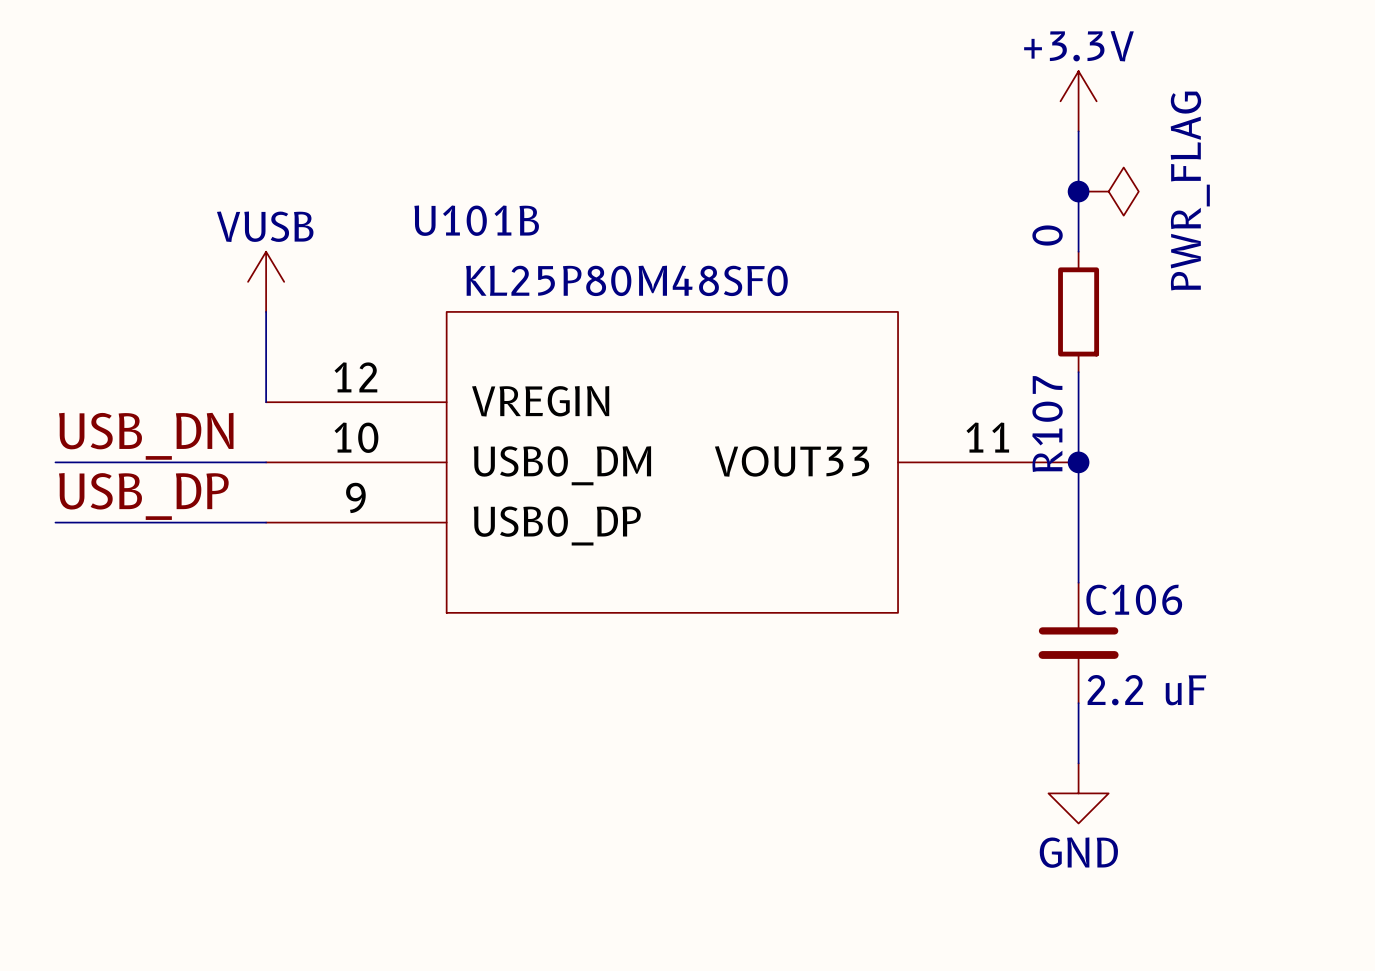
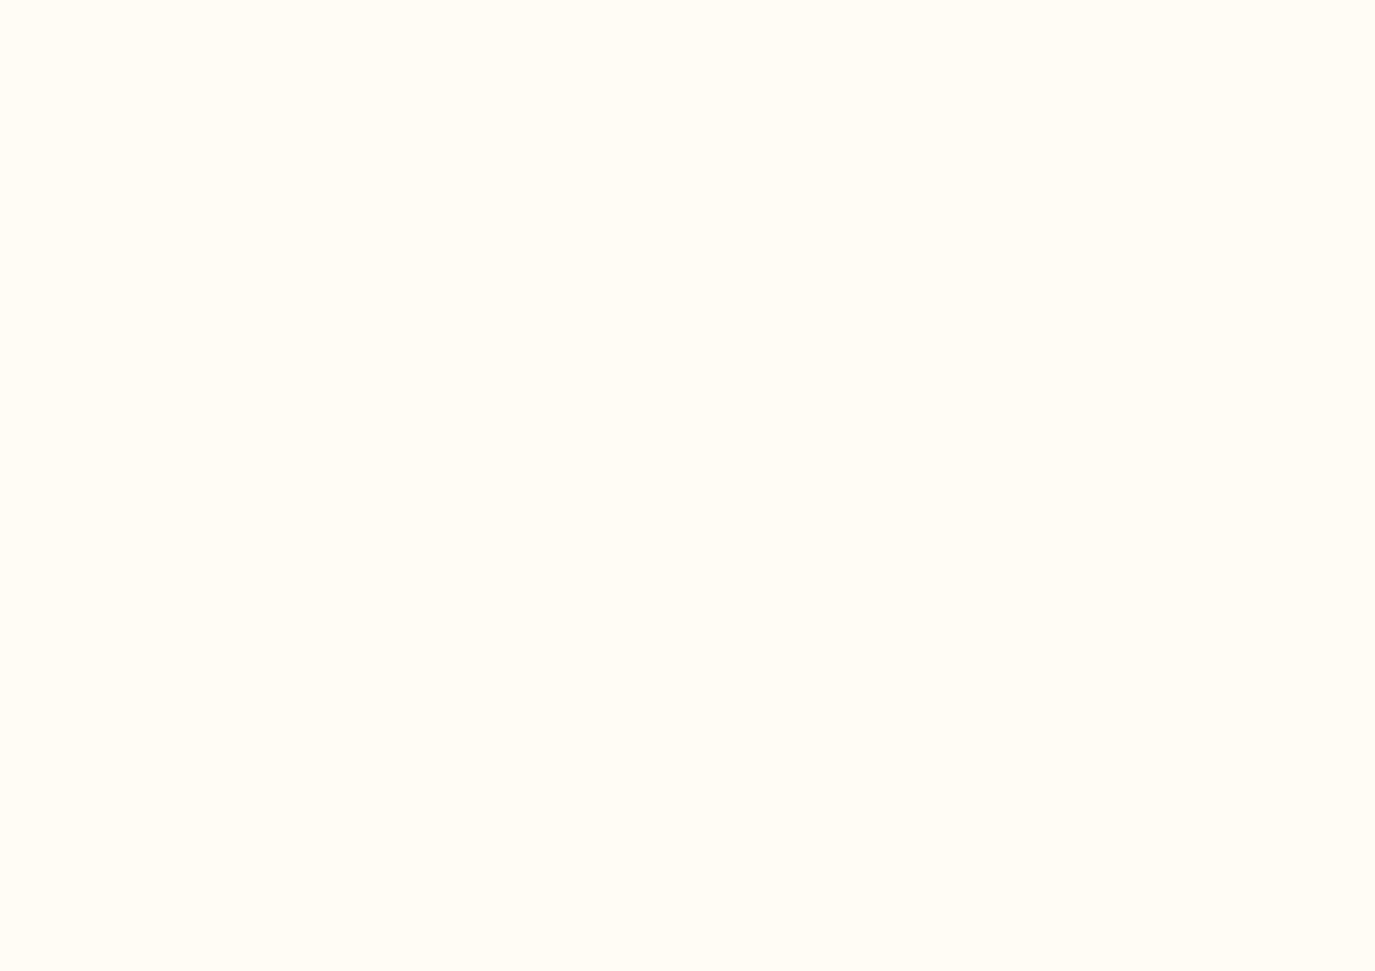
power symbol: +3.3V (1078, 101) -> none
wire: (1078, 131) (1078, 251) -> none
junction: (1078, 191) -> none
power symbol: PWR_FLAG (1108, 191) -> none
power symbol: VUSB (266, 281) -> none
wire: (266, 311) (266, 402) -> none
R107: 0 (1078, 311) -> none
wire: (1078, 372) (1078, 582) -> none
label: USB_DN (146, 436) -> none
wire: (55, 462) (266, 462) -> none
U101B: KL25P80M48SF0 (672, 462) -> none
junction: (1078, 462) -> none
label: USB_DP (143, 496) -> none
wire: (55, 522) (266, 522) -> none
C106: 2.2 uF (1078, 642) -> none
wire: (1078, 703) (1078, 763) -> none
power symbol: GND (1078, 793) -> none

